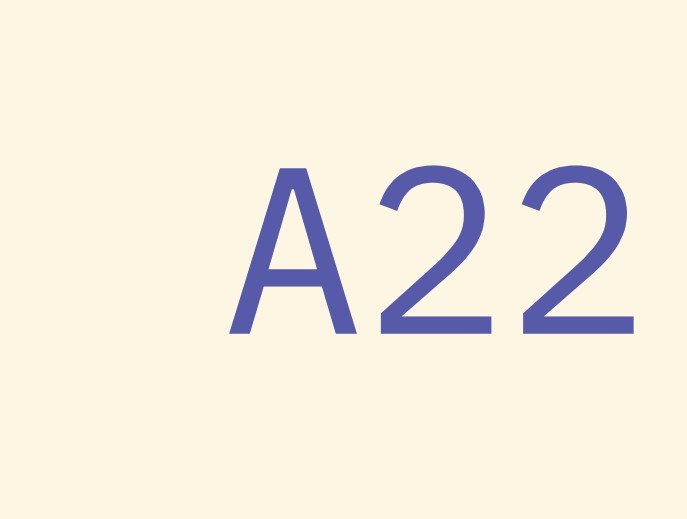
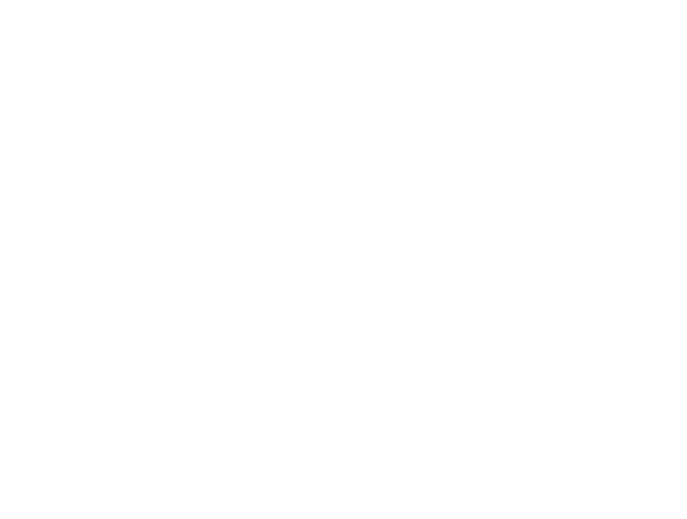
text: A22 (431, 249) -> none

